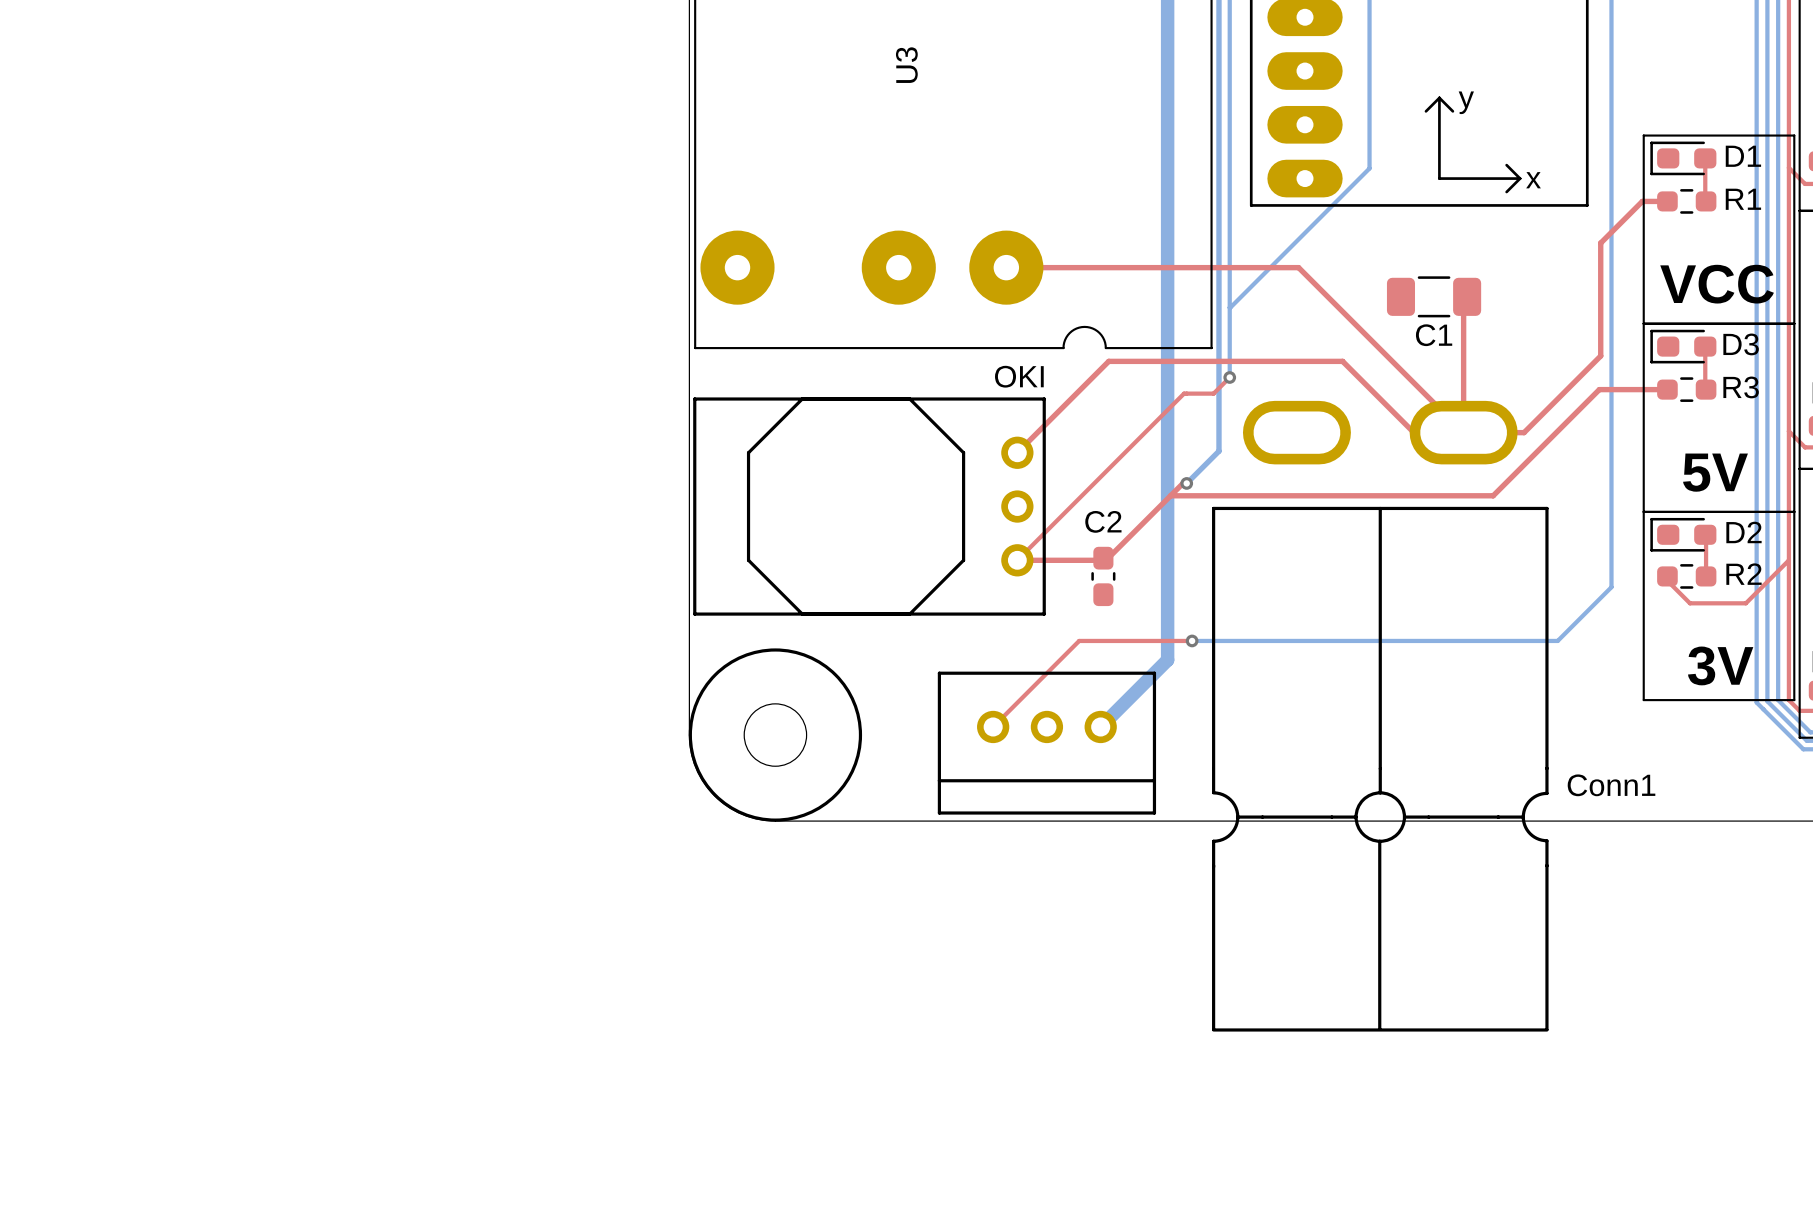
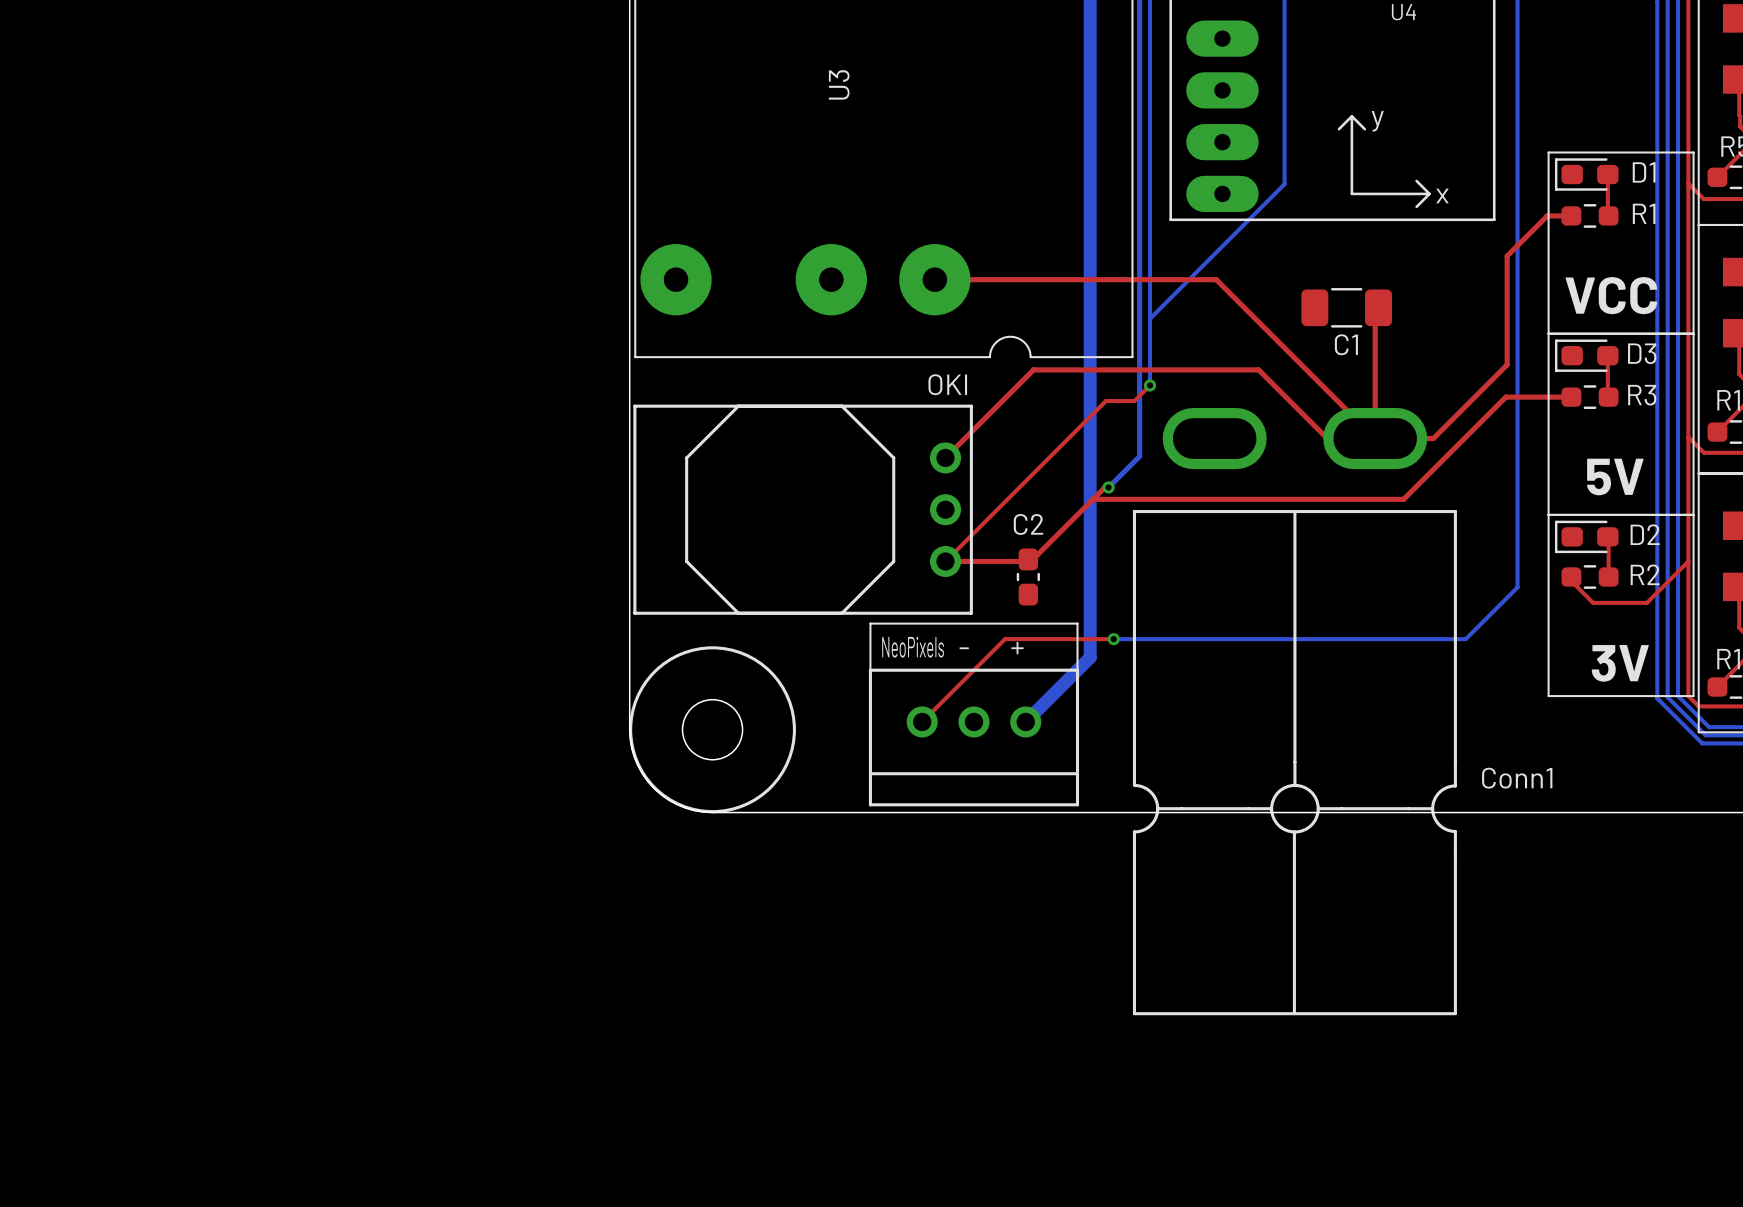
line: none -> (870, 623) (1077, 623) (1077, 670) (870, 670) (870, 623)
text: none -> NeoPixels (913, 647)
text: none -> + (1017, 648)
text: none -> - (964, 648)

